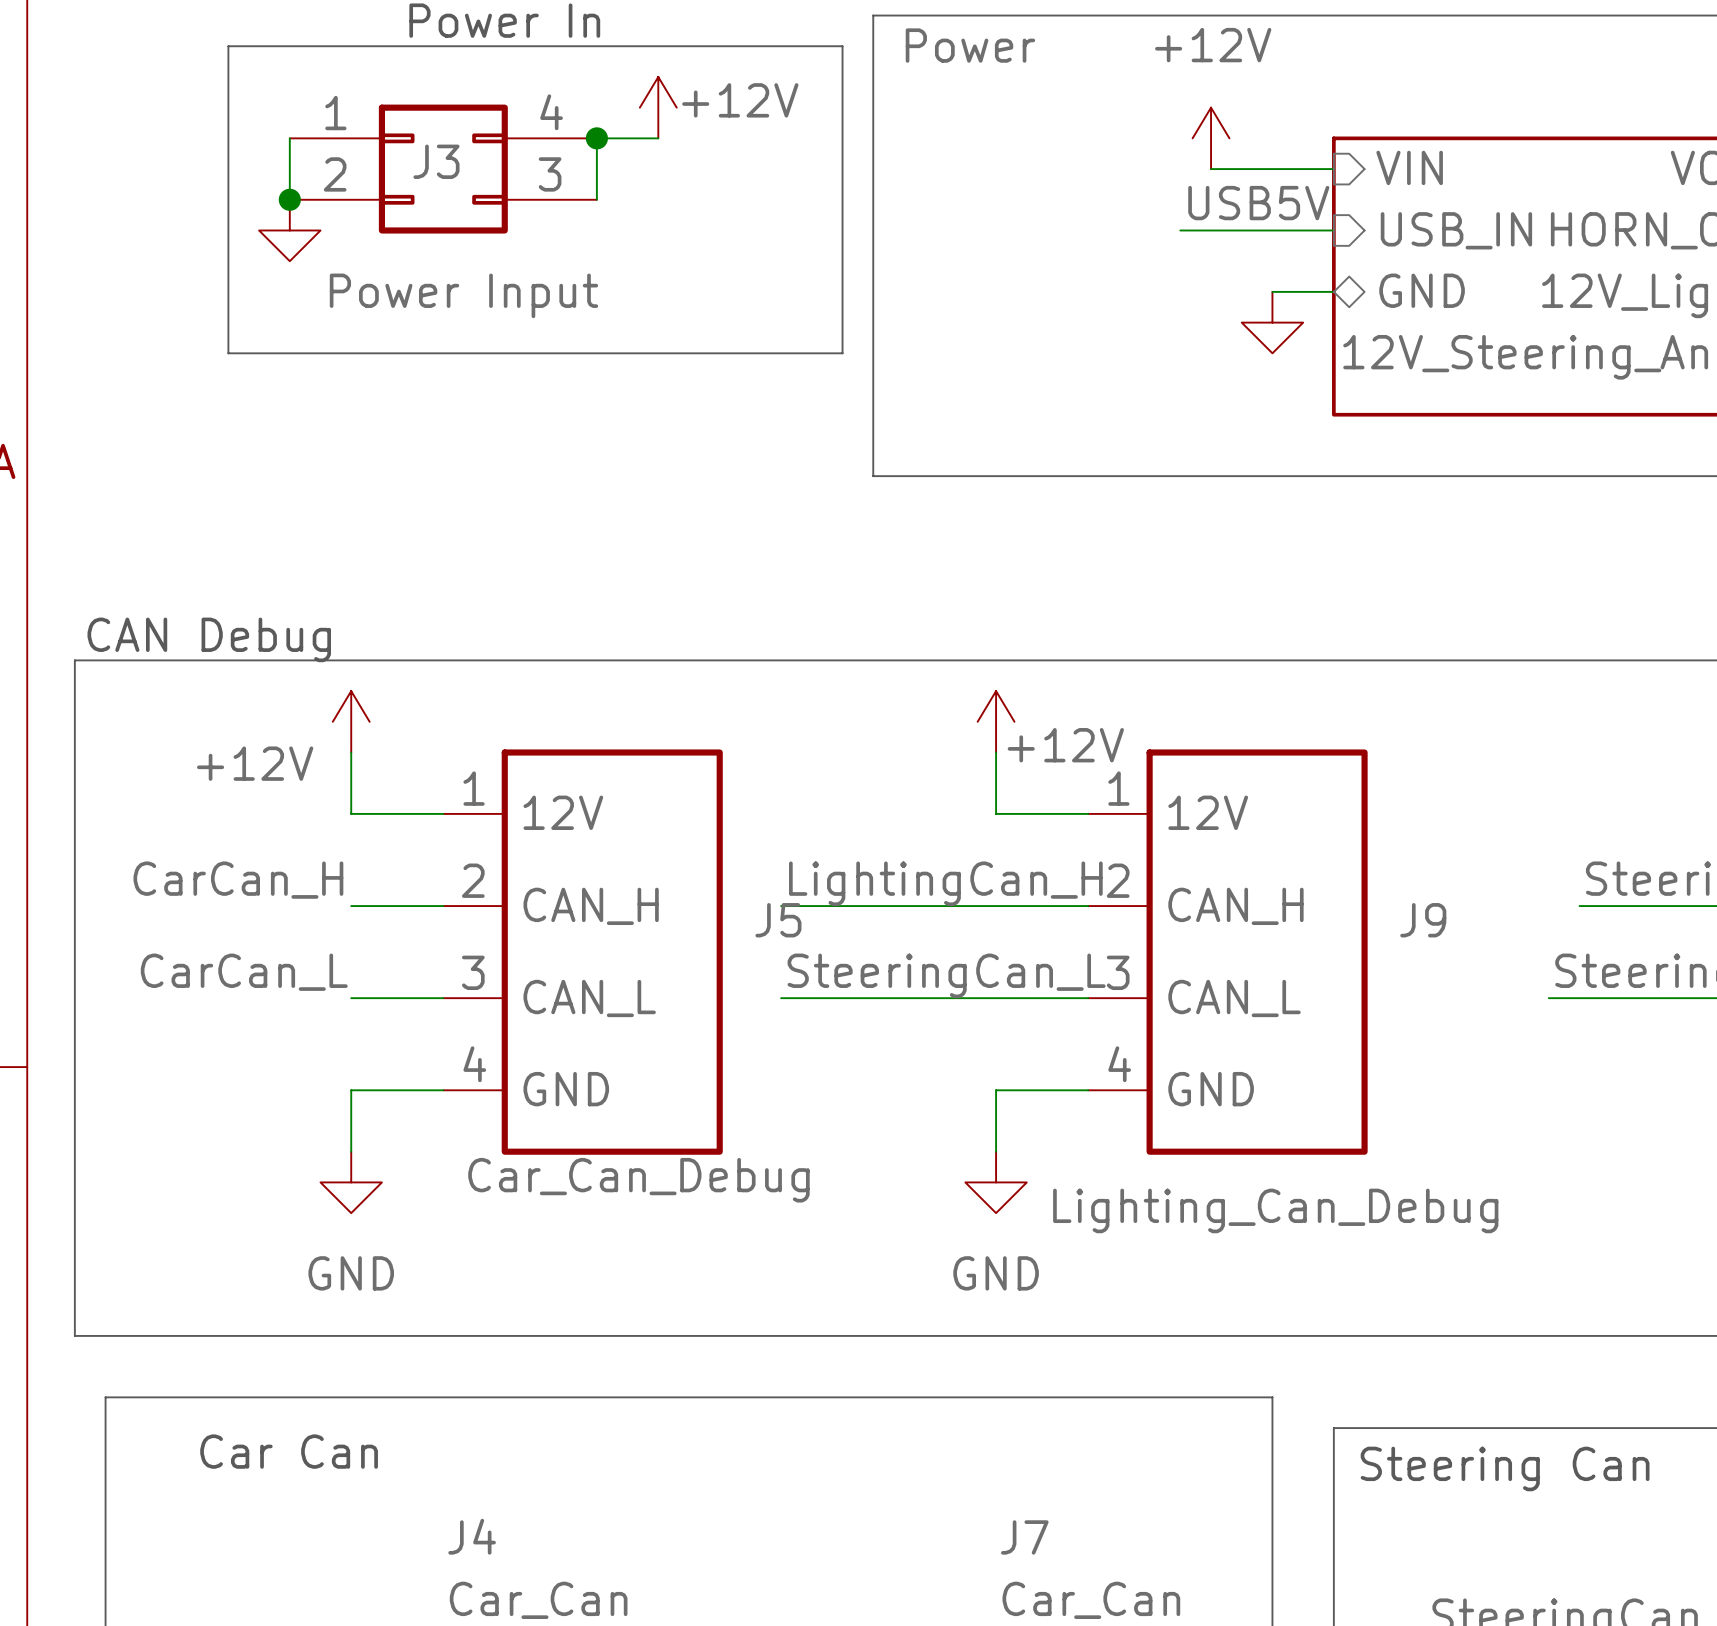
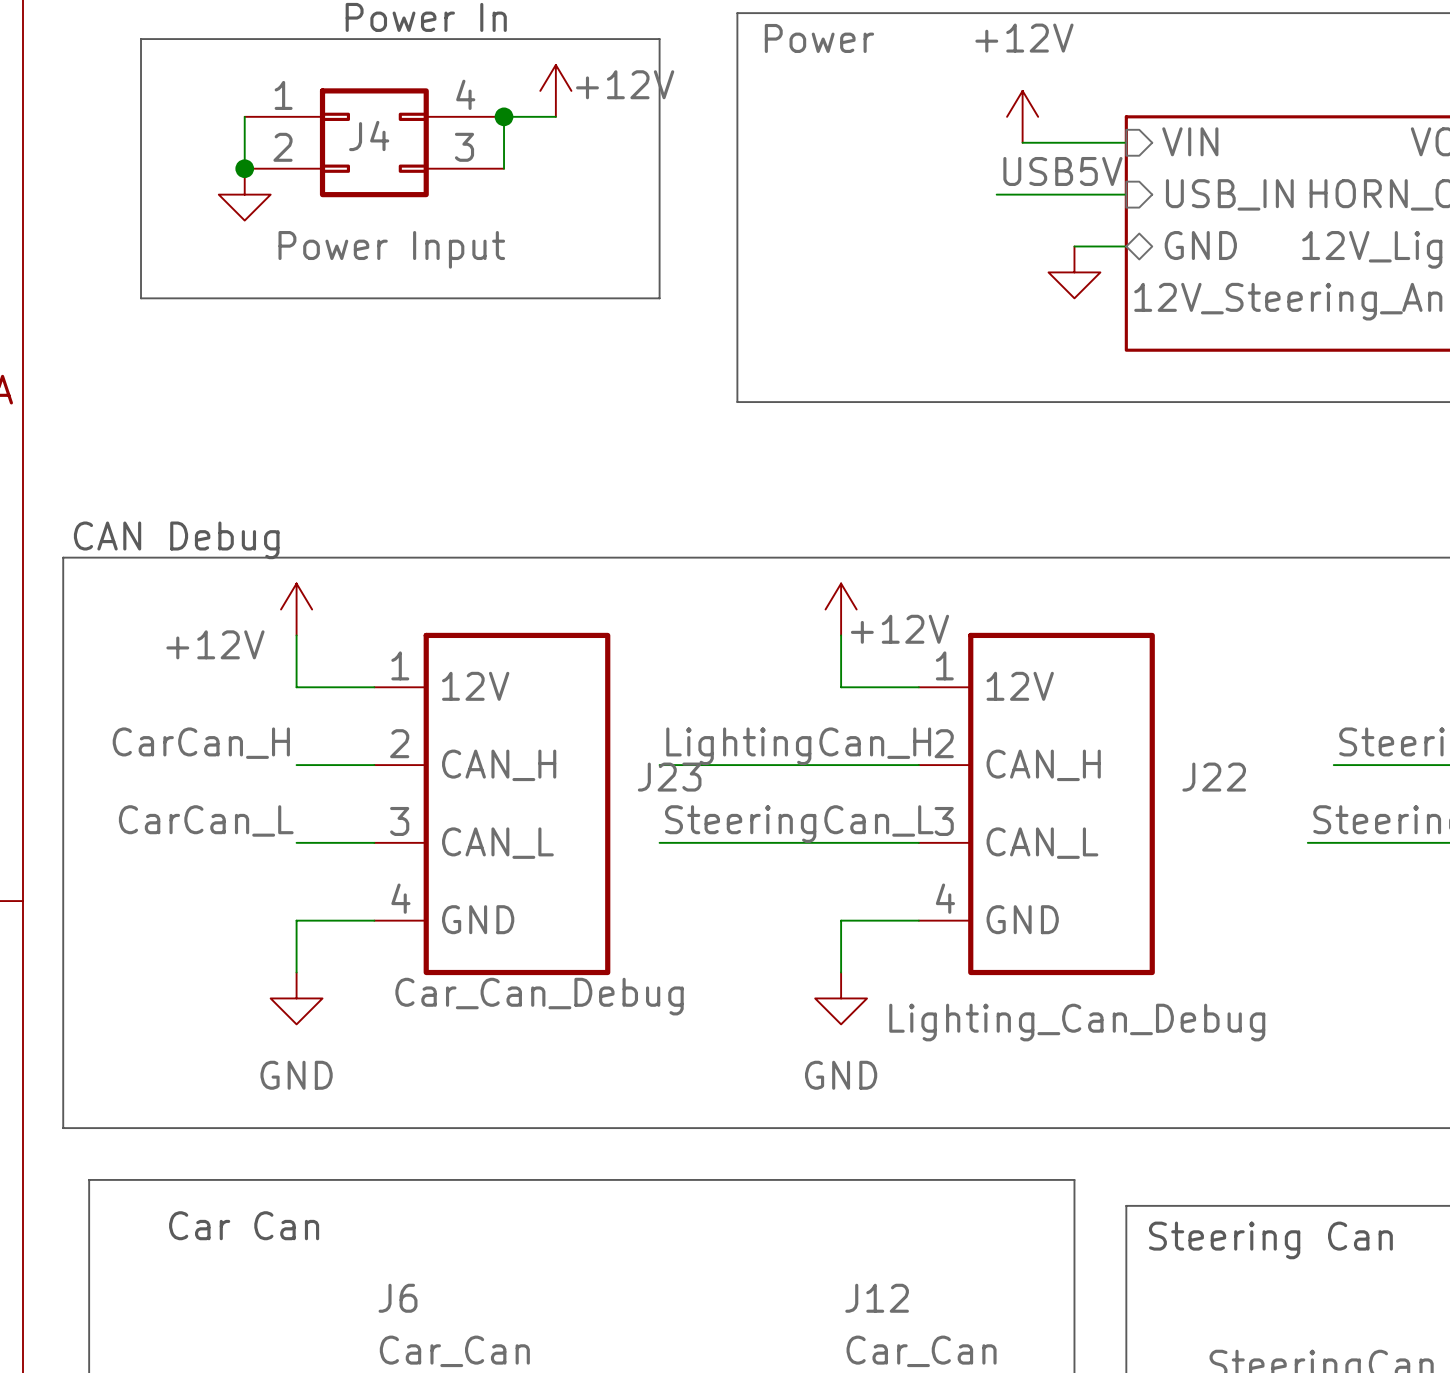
line: (228, 46) (228, 353) -> (192, 39) (141, 39) (141, 298) (192, 298)
line: (781, 46) (842, 46) (842, 353) (781, 353) -> (659, 39) (659, 298)
J3 name: J3 (436, 161) -> J4 (369, 135)
J5 name: J5 (778, 920) -> J23 (669, 777)
J9 name: J9 (1423, 920) -> J22 (1214, 777)
J4 name: J4 (472, 1536) -> J6 (398, 1298)
J7 name: J7 (1024, 1537) -> J12 (877, 1298)

